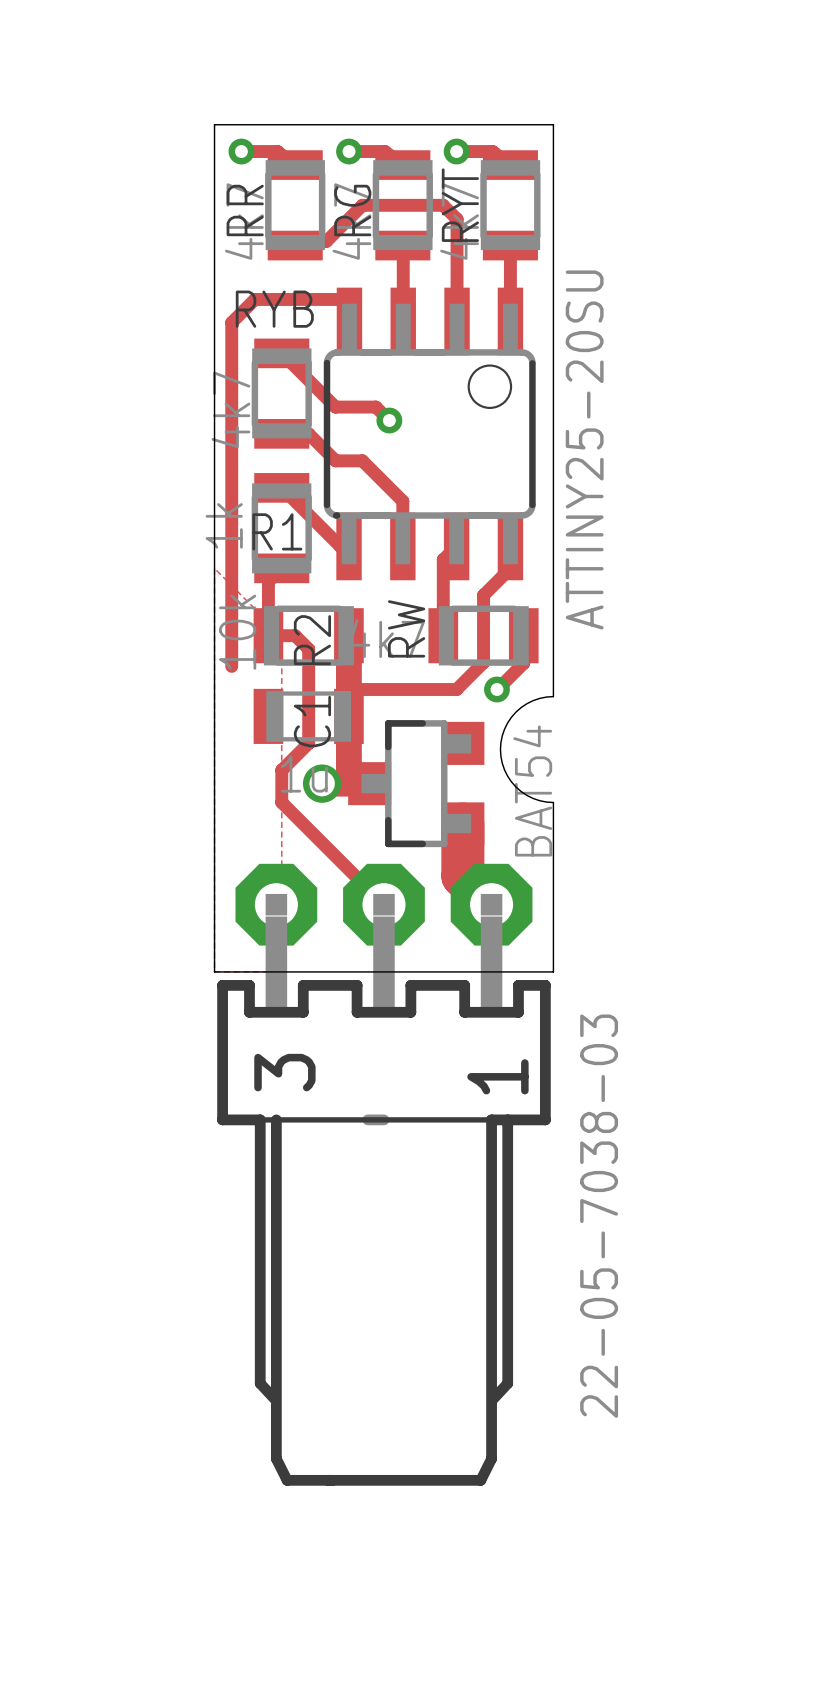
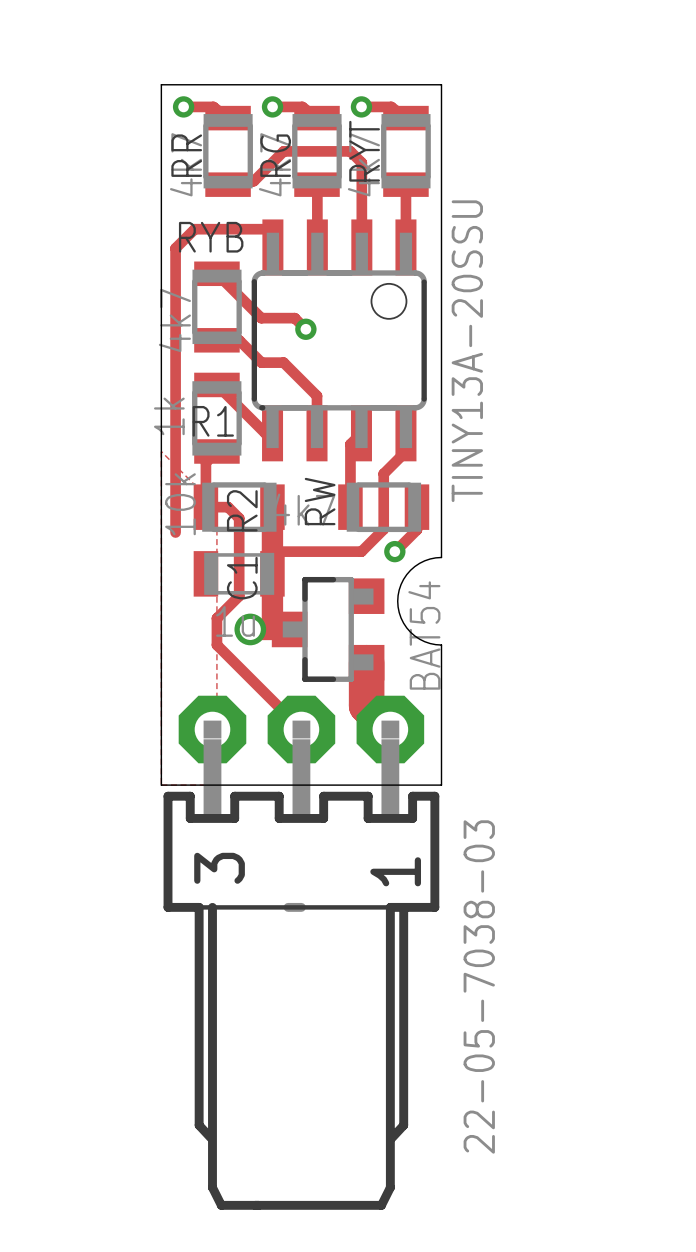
part value: ATTINY25-20SU (584, 449) -> TINY13A-20SSU (467, 351)

